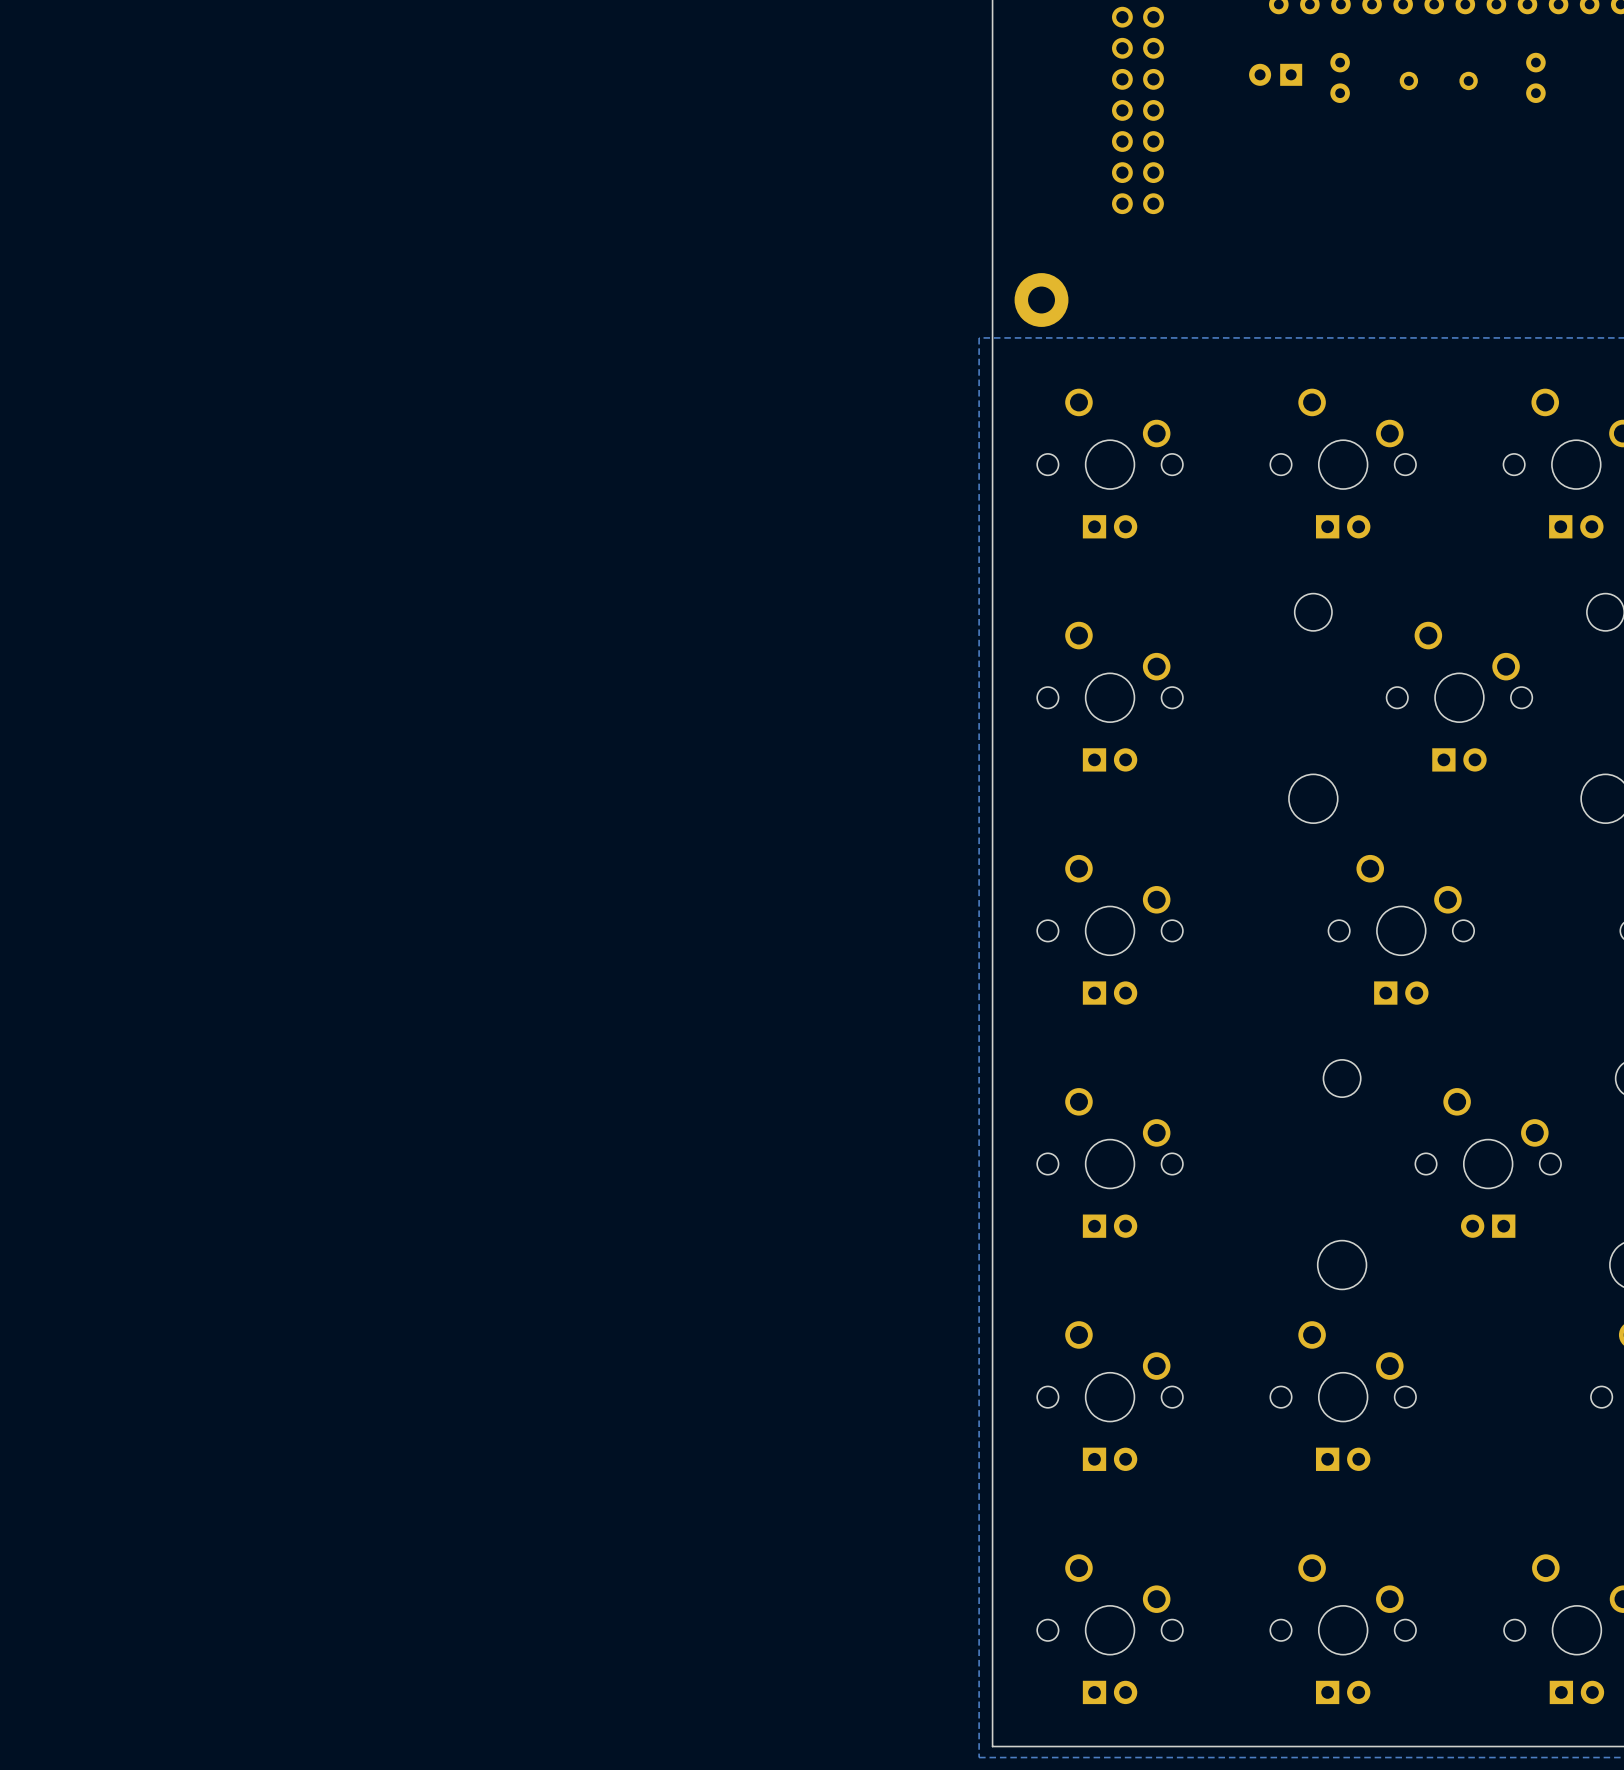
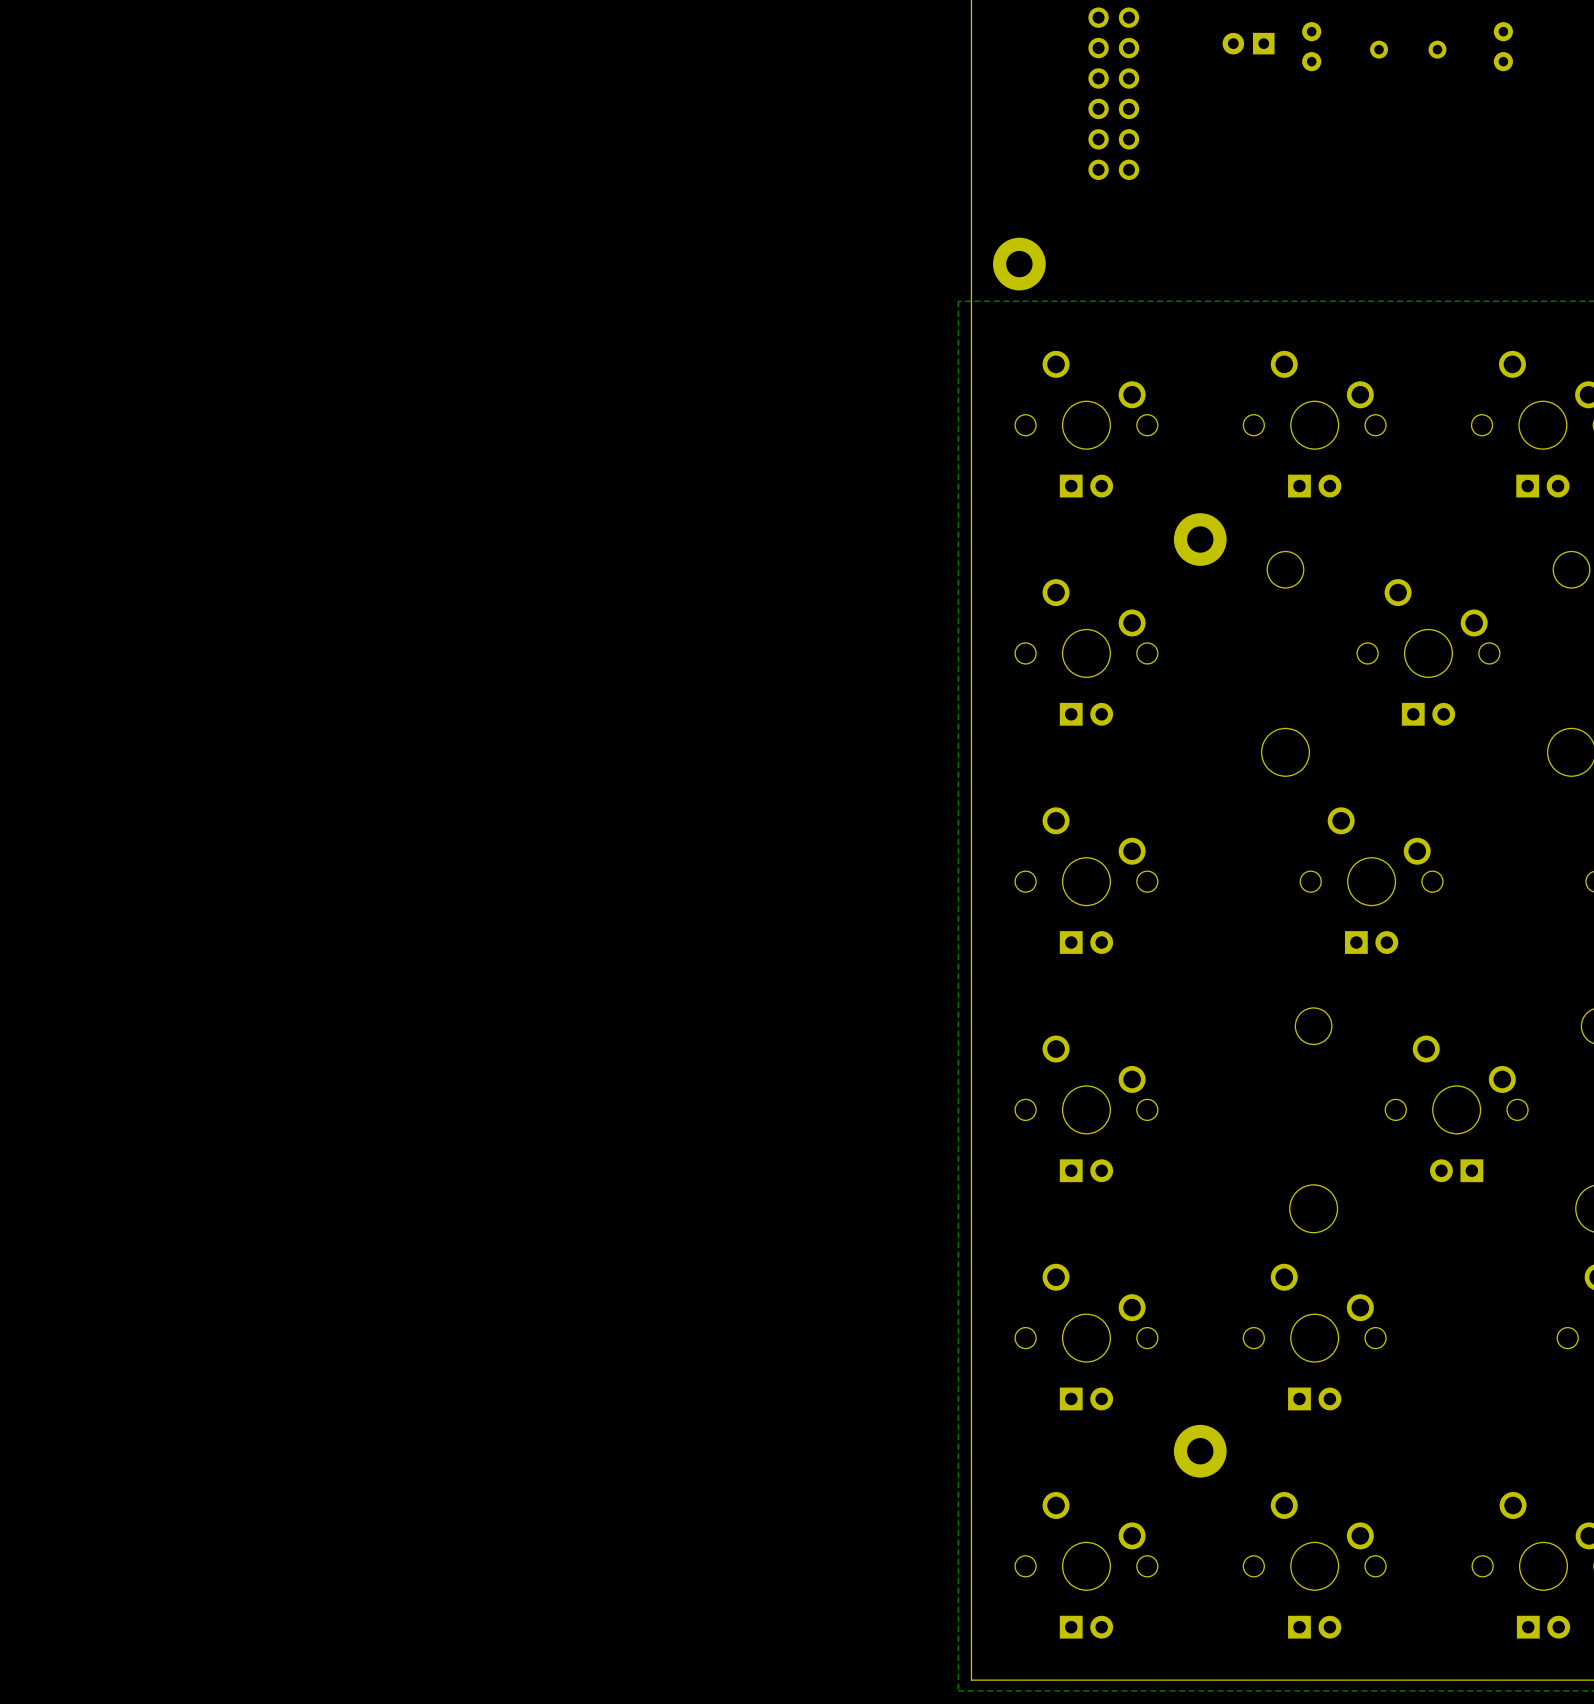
part: none -> (1200, 539)
part: none -> (1200, 1451)

